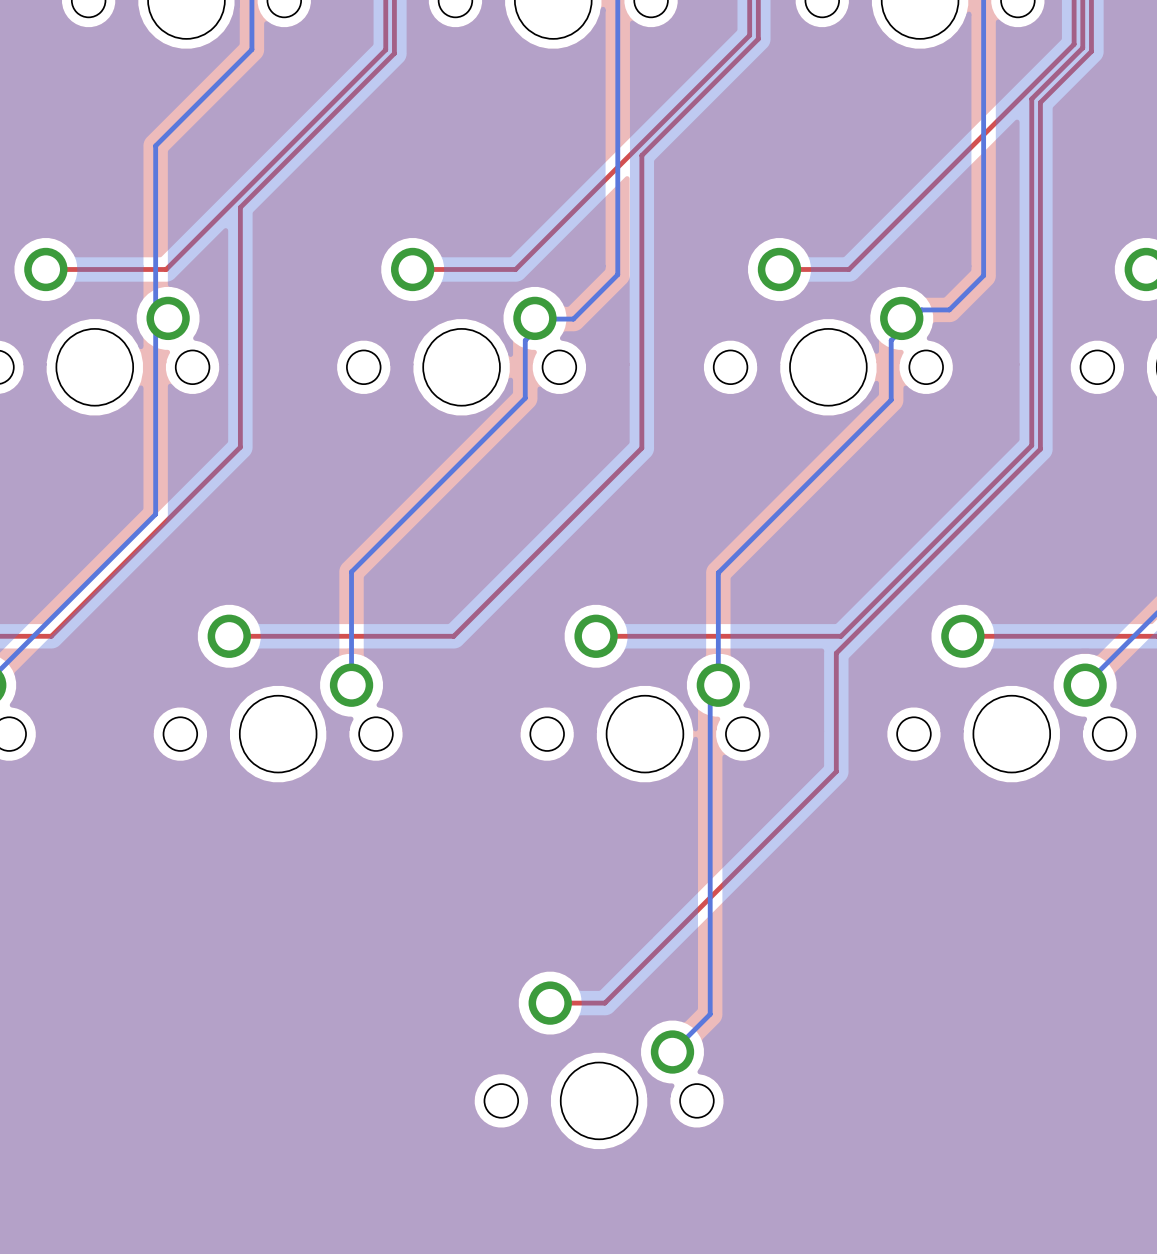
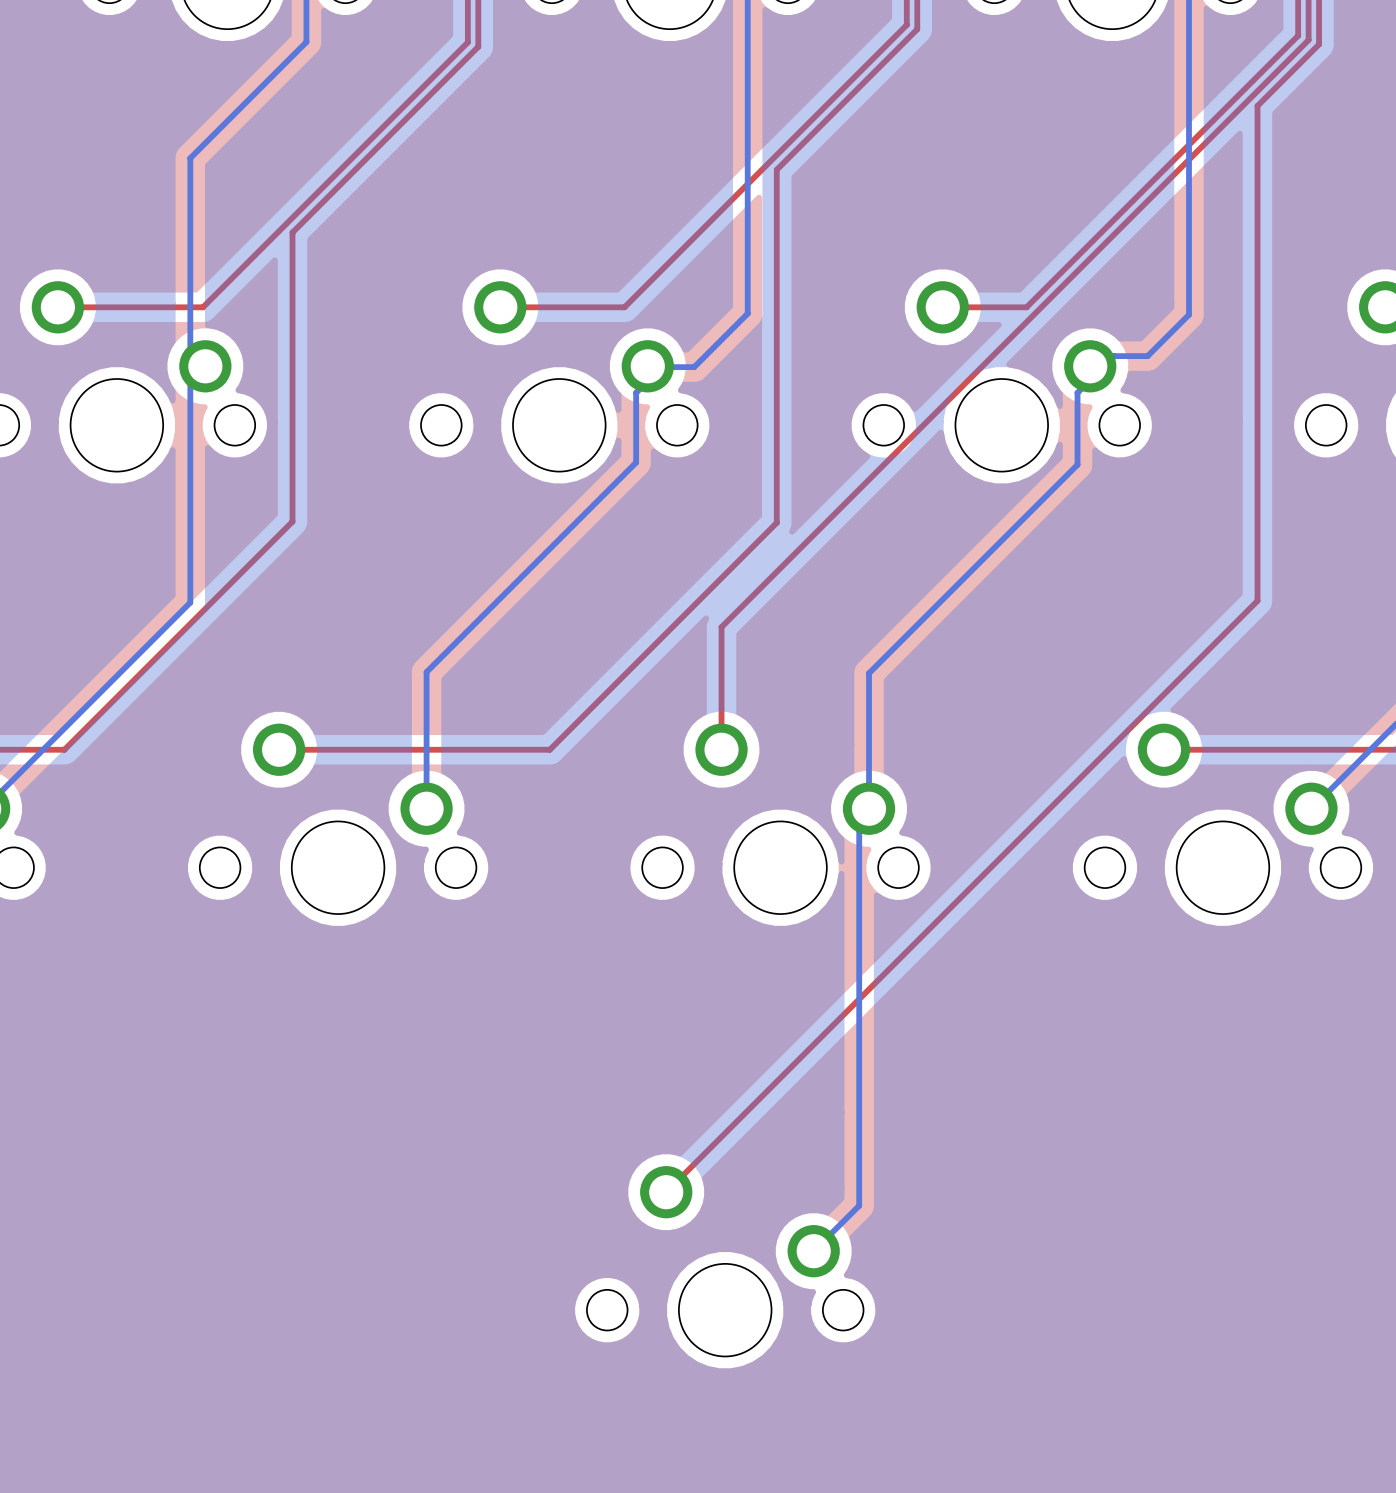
top track: (1031, 98) (1031, 445) (841, 636) (596, 636) -> (1247, 101) (721, 627) (721, 749)
top track: (1040, 449) (836, 653) (836, 771) (604, 1003) (550, 1003) -> (1257, 524) (1257, 600) (666, 1192)

